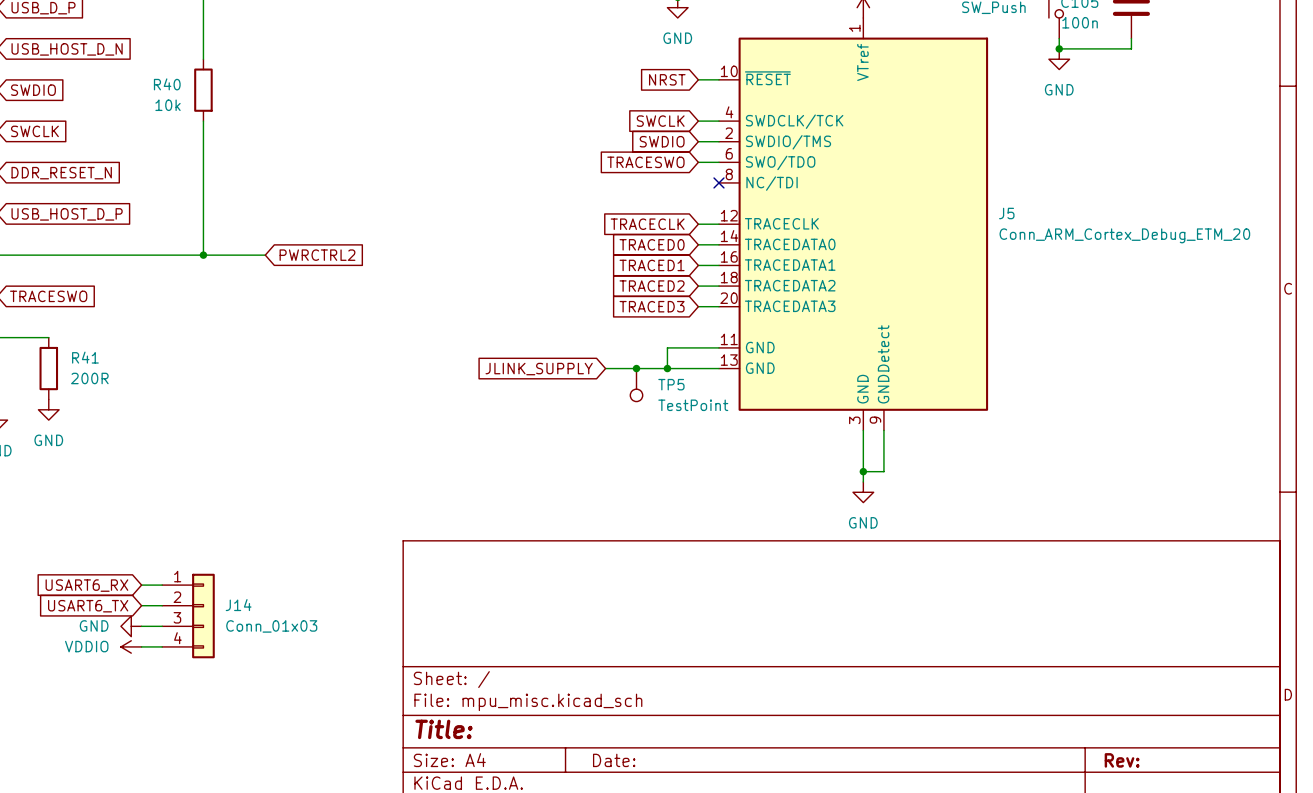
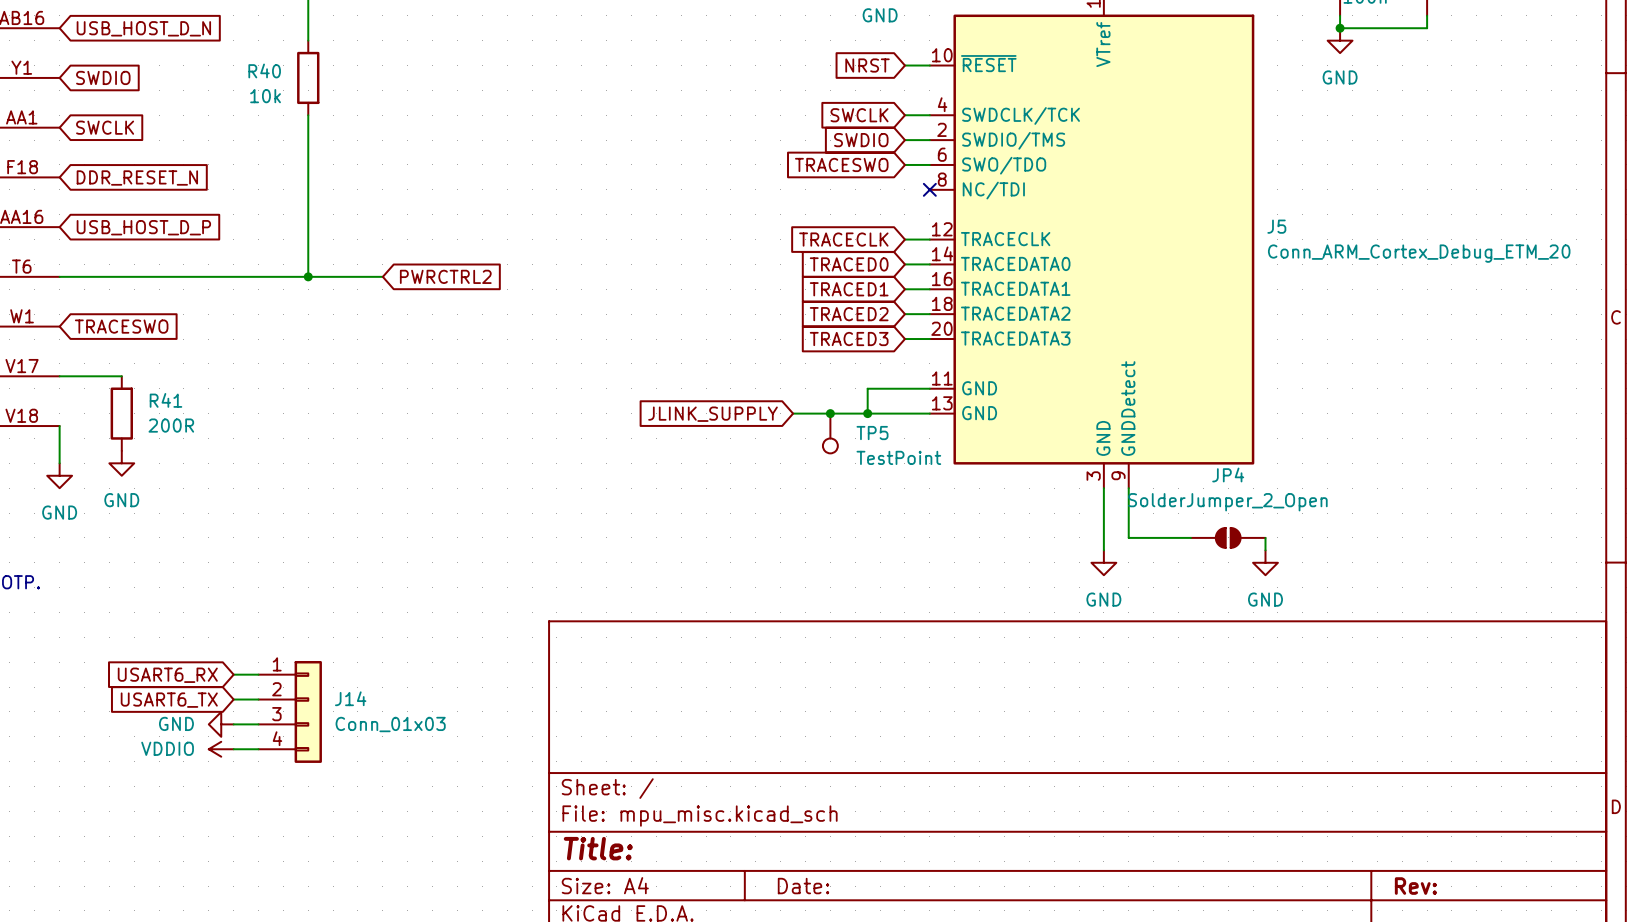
wire: (863, 471) (883, 471) -> (1190, 537) (1128, 537)
junction: (863, 471) -> none
JP4: none -> SolderJumper_2_Open (1228, 537)
wire: none -> (1265, 537) (1265, 550)
power symbol: none -> GND (1265, 562)

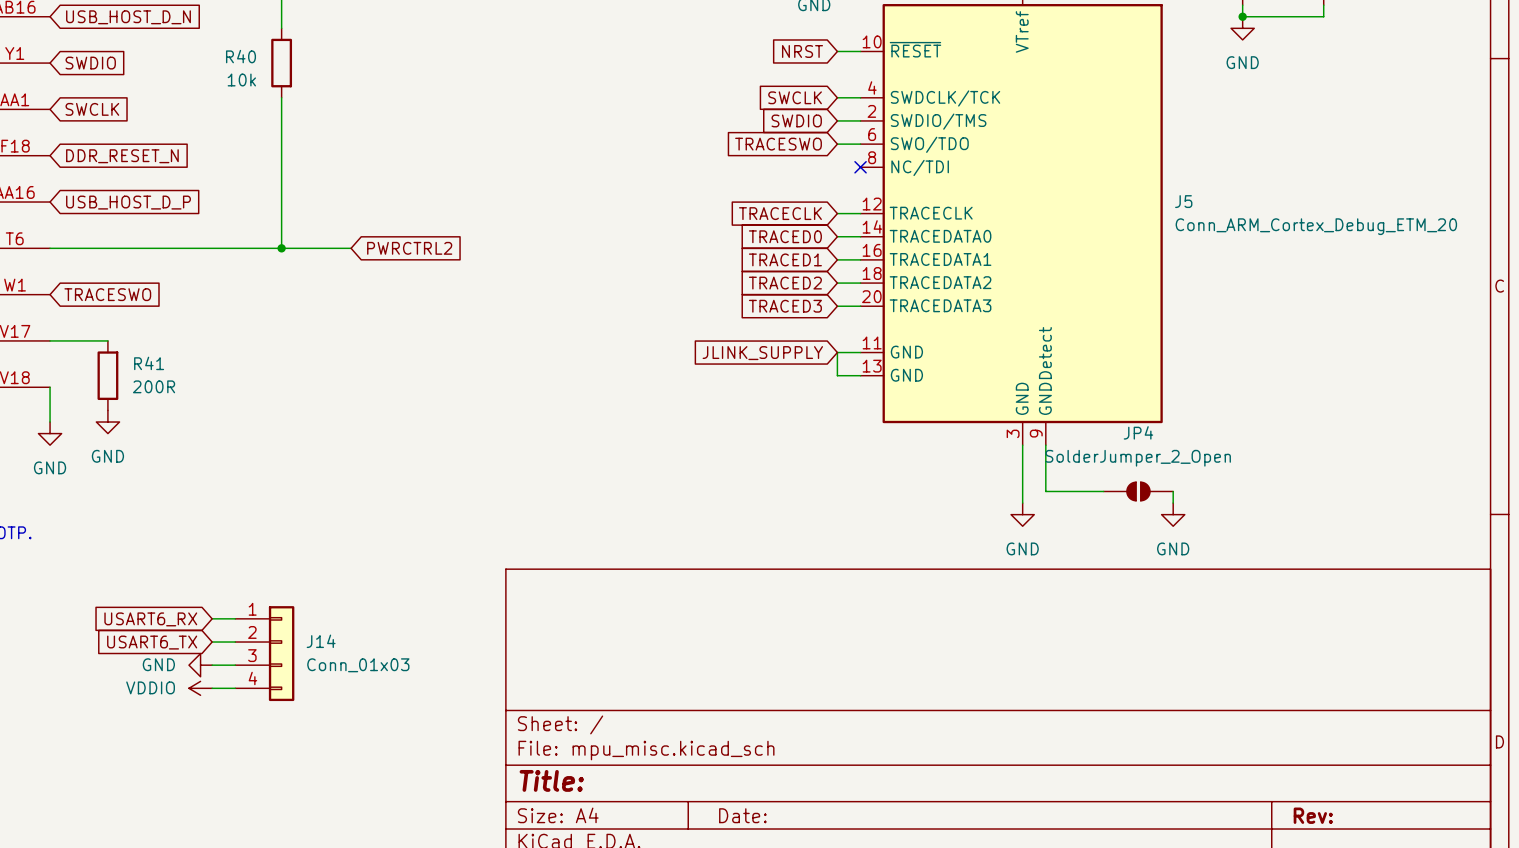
wire: (904, 388) (867, 388) (867, 413) -> (837, 352) (837, 375)
wire: (793, 413) (904, 413) -> none
junction: (830, 413) -> none
junction: (867, 413) -> none
global label position: JLINK_SUPPLY (713, 414) -> JLINK_SUPPLY (762, 353)
TP5: TestPoint (830, 433) -> none

